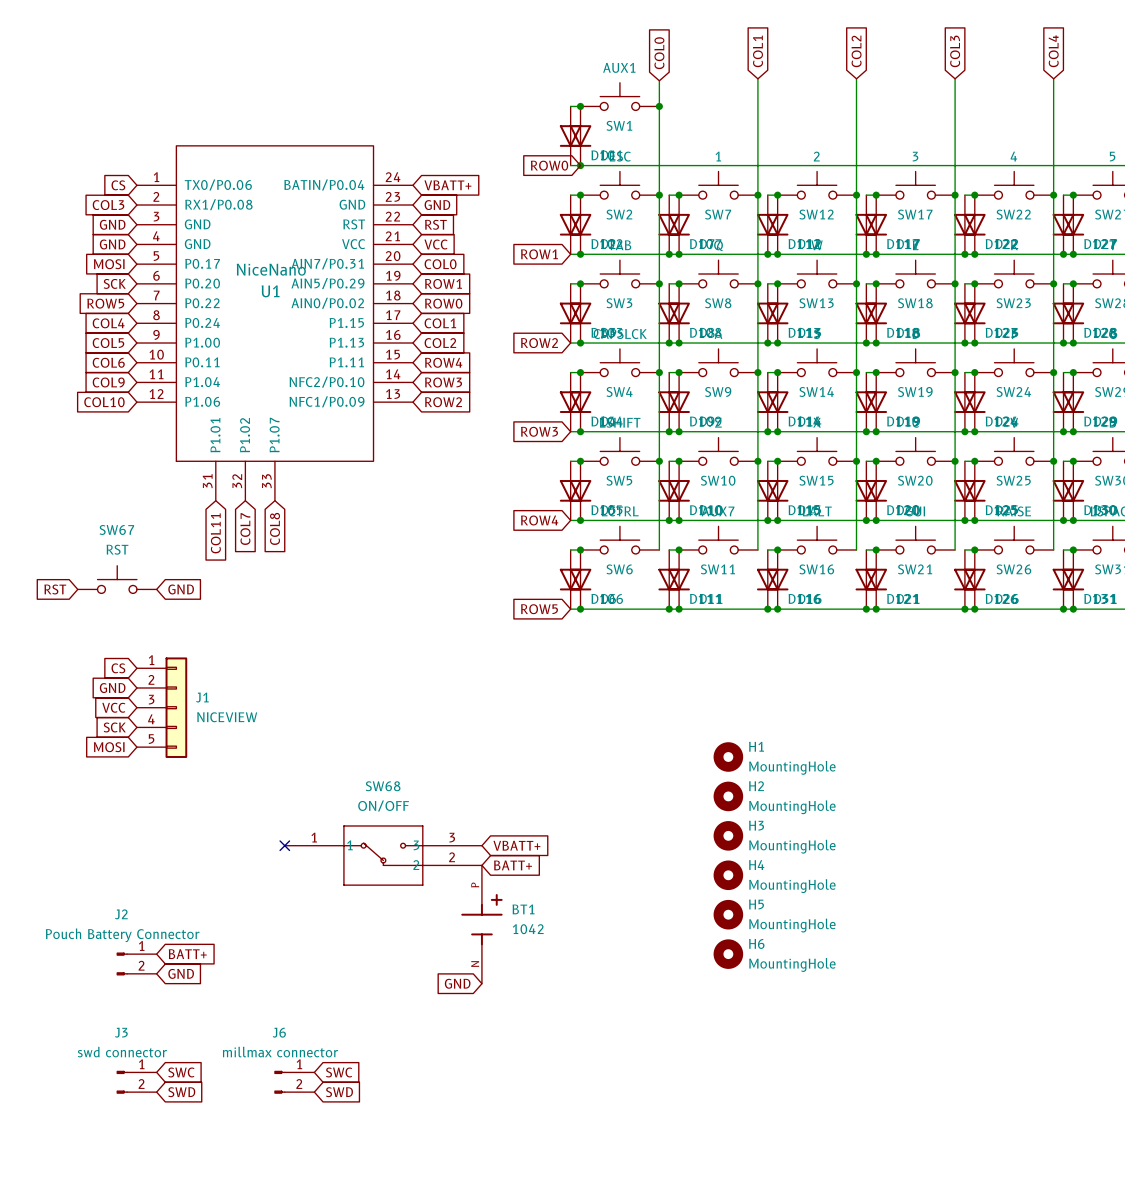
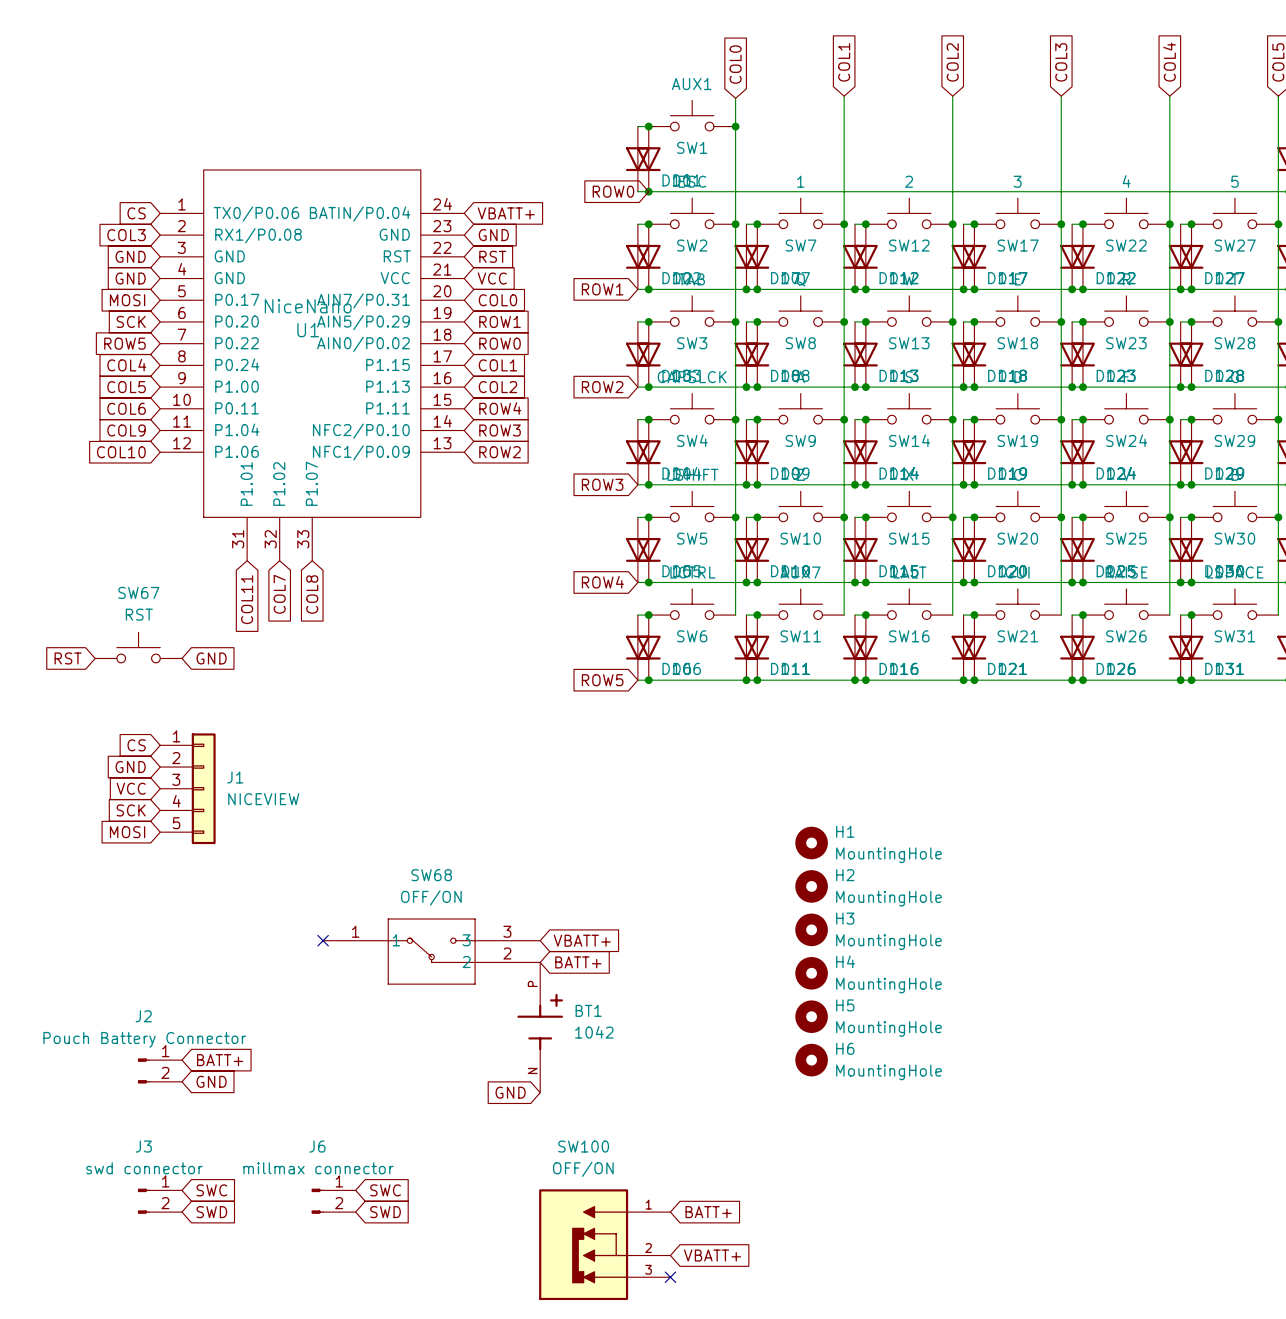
SW68 value: ON/OFF (383, 805) -> OFF/ON (431, 897)
global label: none -> BATT+ (708, 1212)
SW100: none -> OFF/ON (604, 1244)
global label: none -> VBATT+ (712, 1255)
no-connect mark: none -> (670, 1277)

